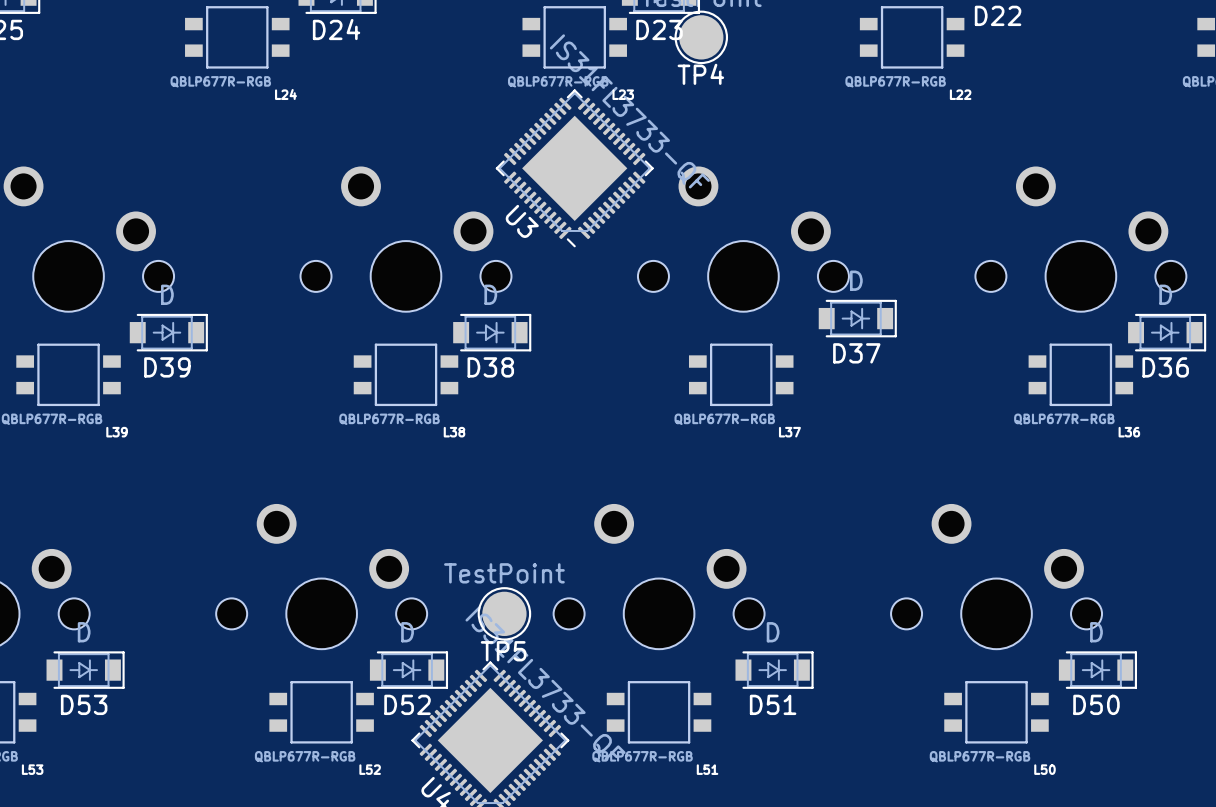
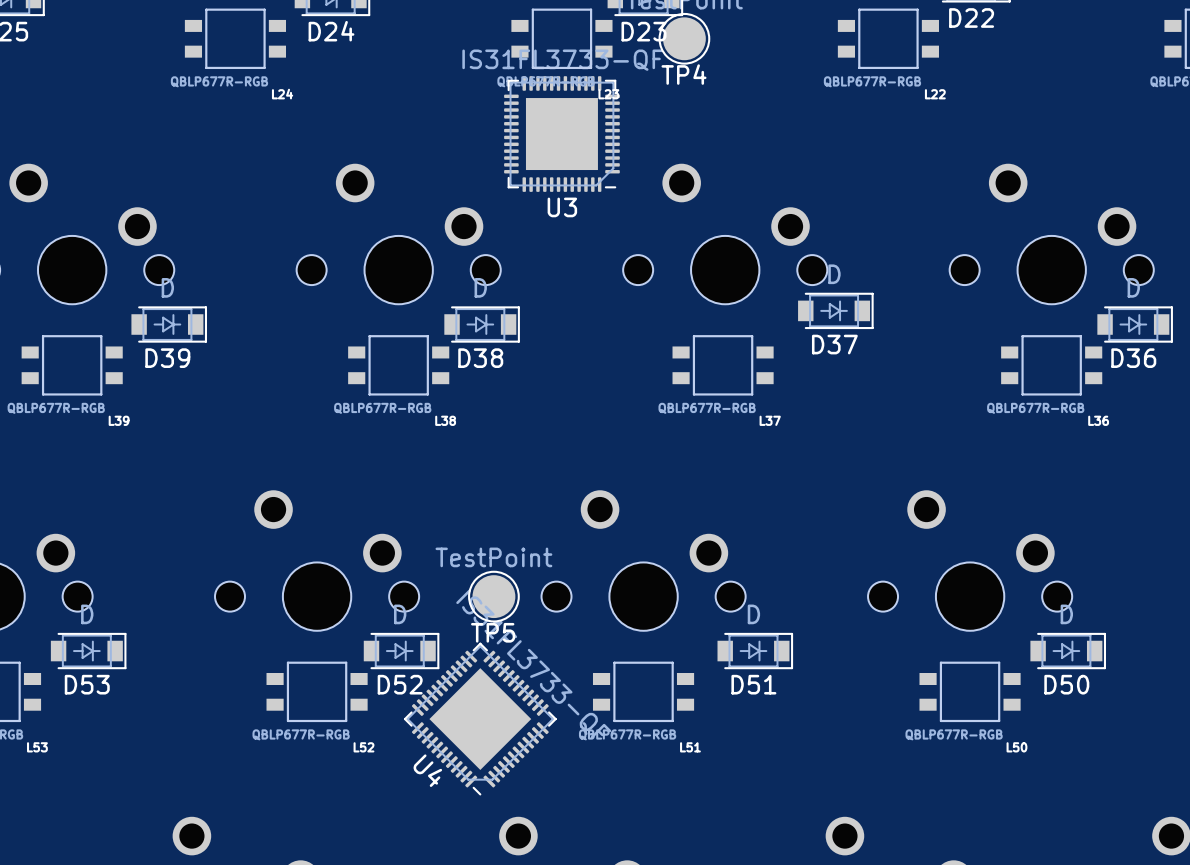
U3 rotation: 0° (574, 168) -> 45° counterclockwise (561, 134)

